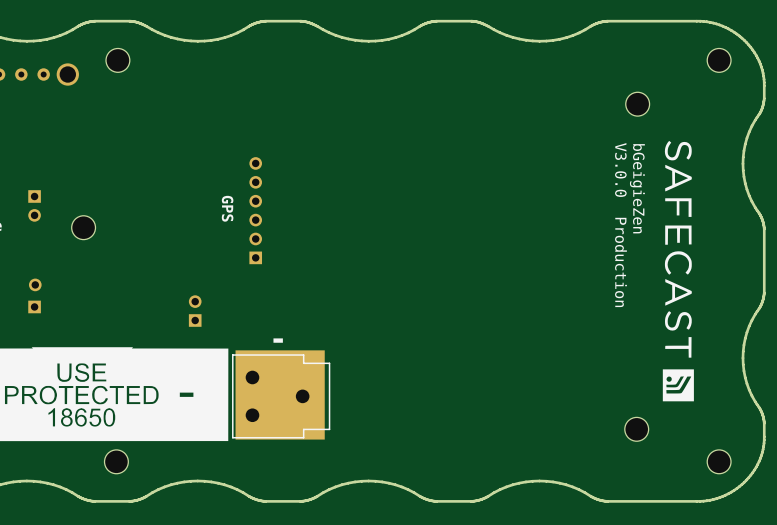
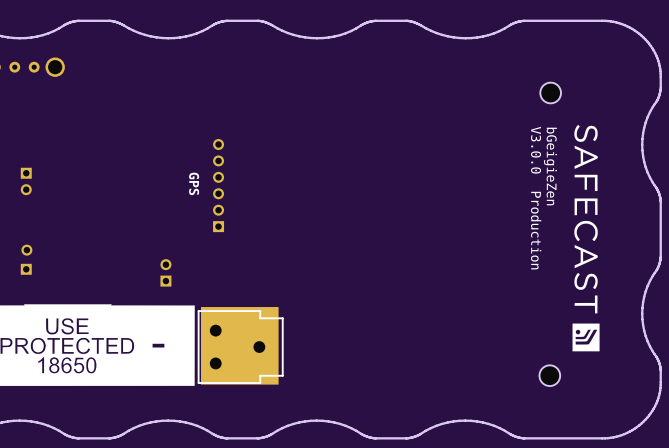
part: (117, 60) -> none
part: (719, 60) -> none
part: (83, 227) -> none
part text: - (278, 340) -> none
part: (116, 461) -> none
part: (719, 461) -> none

